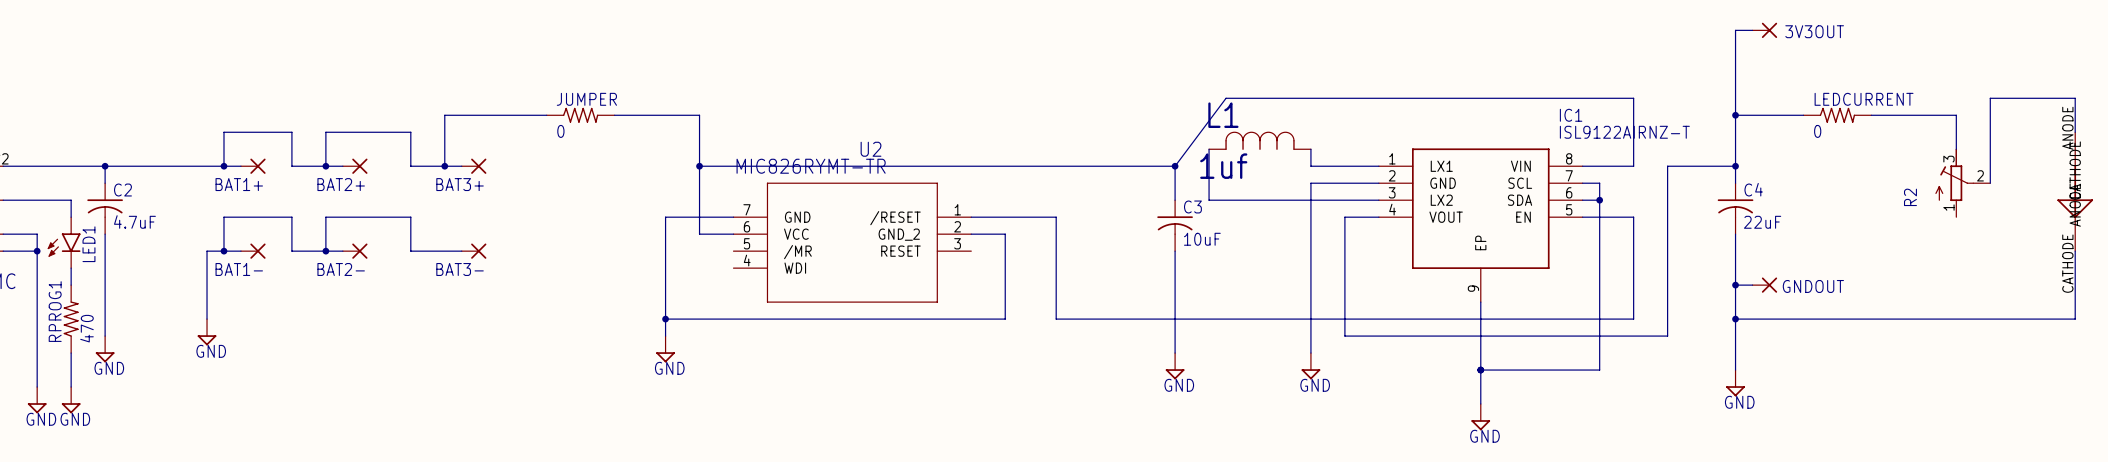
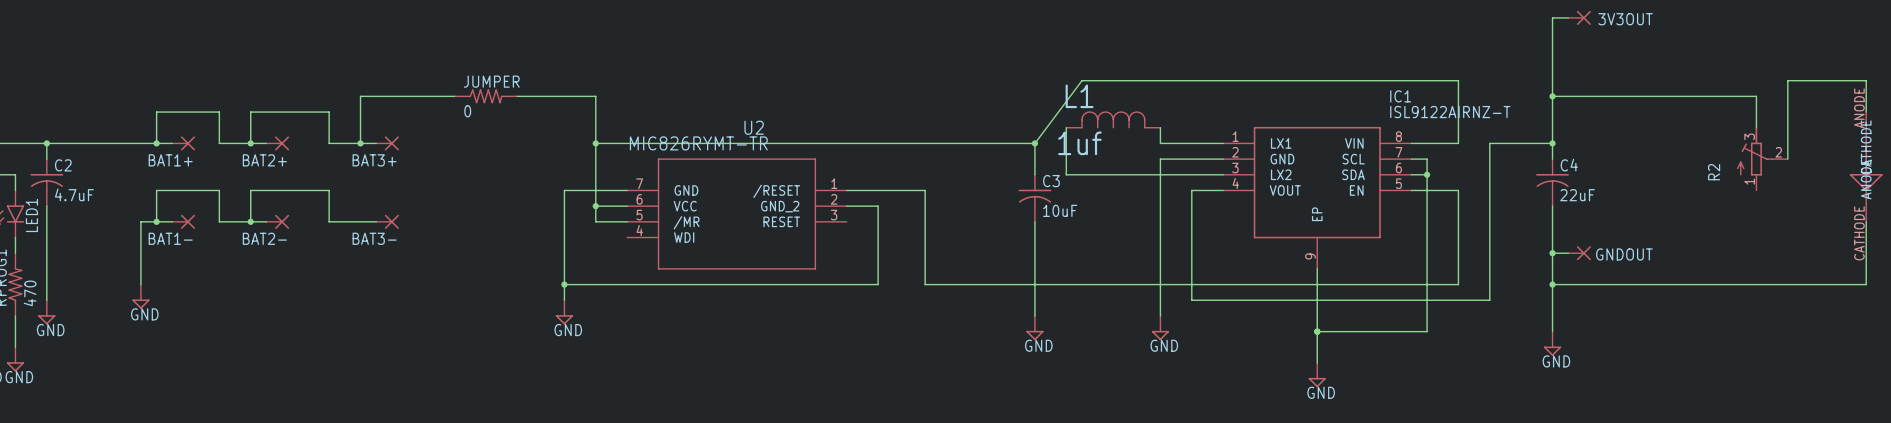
LEDCURRENT: 0 (1837, 115) -> none
wire: none -> (595, 206) (595, 221) (627, 221)
junction: none -> (595, 206)

